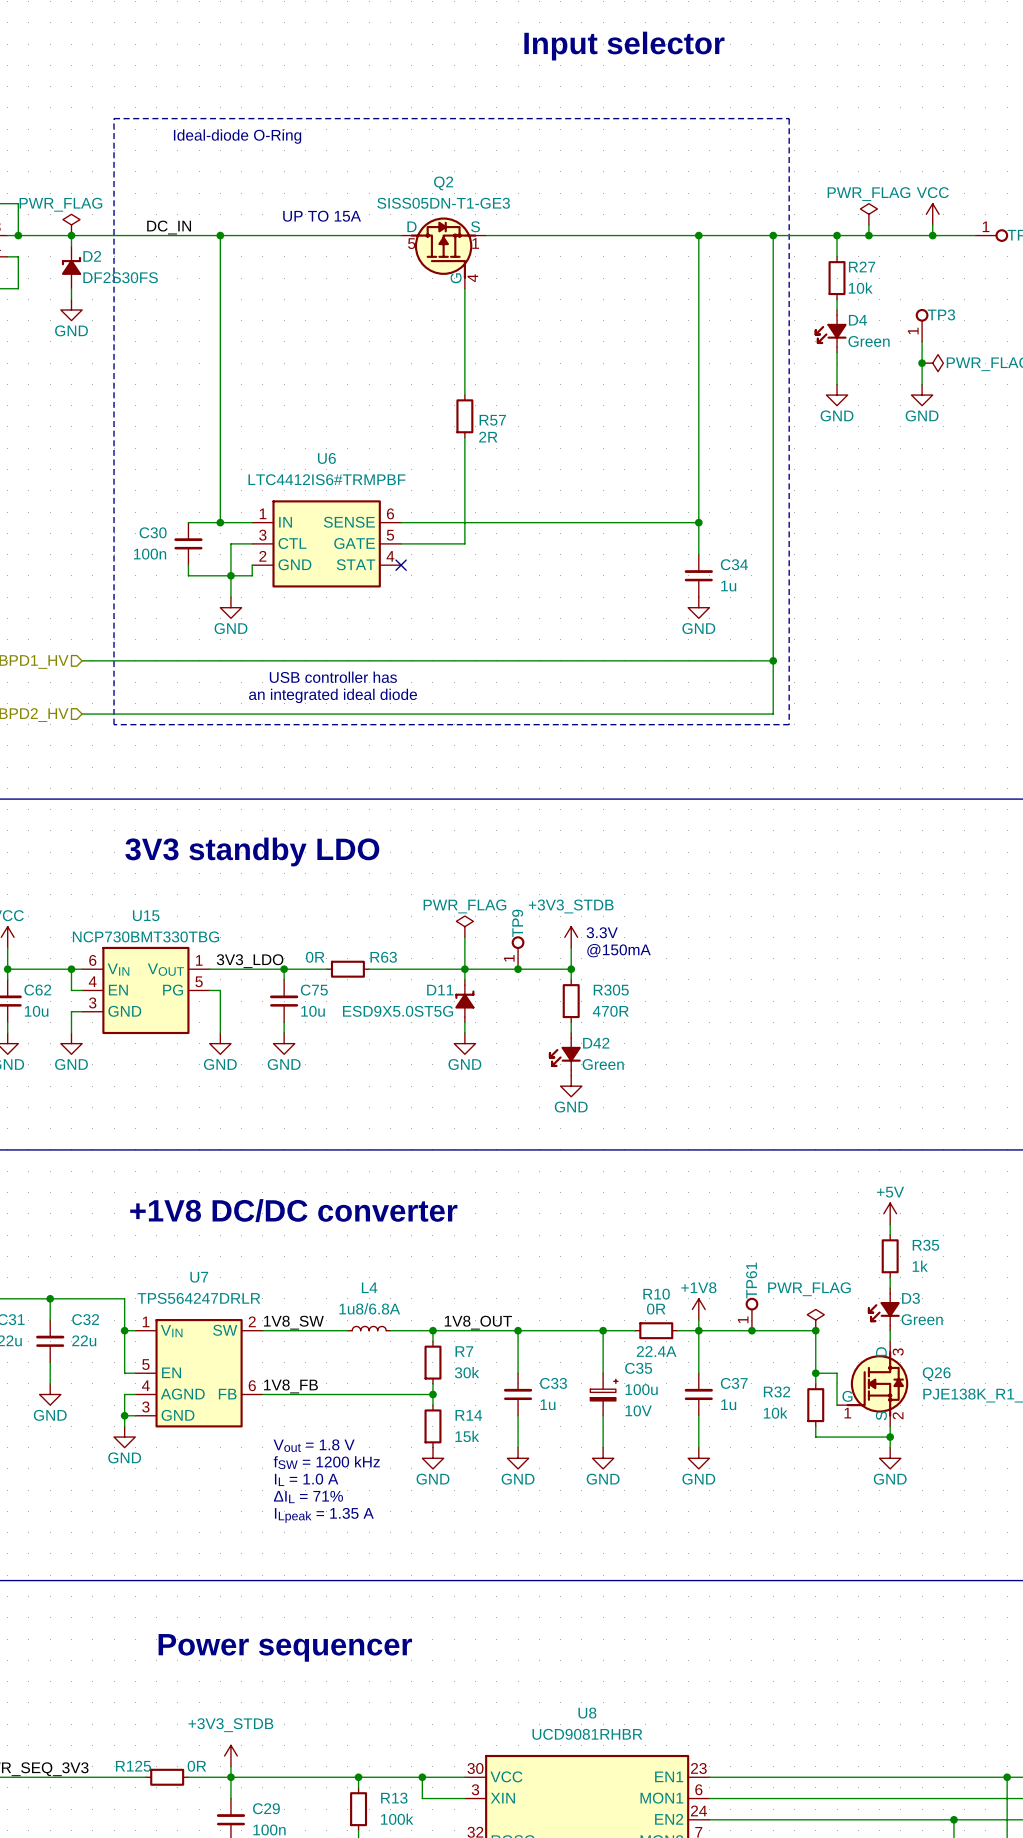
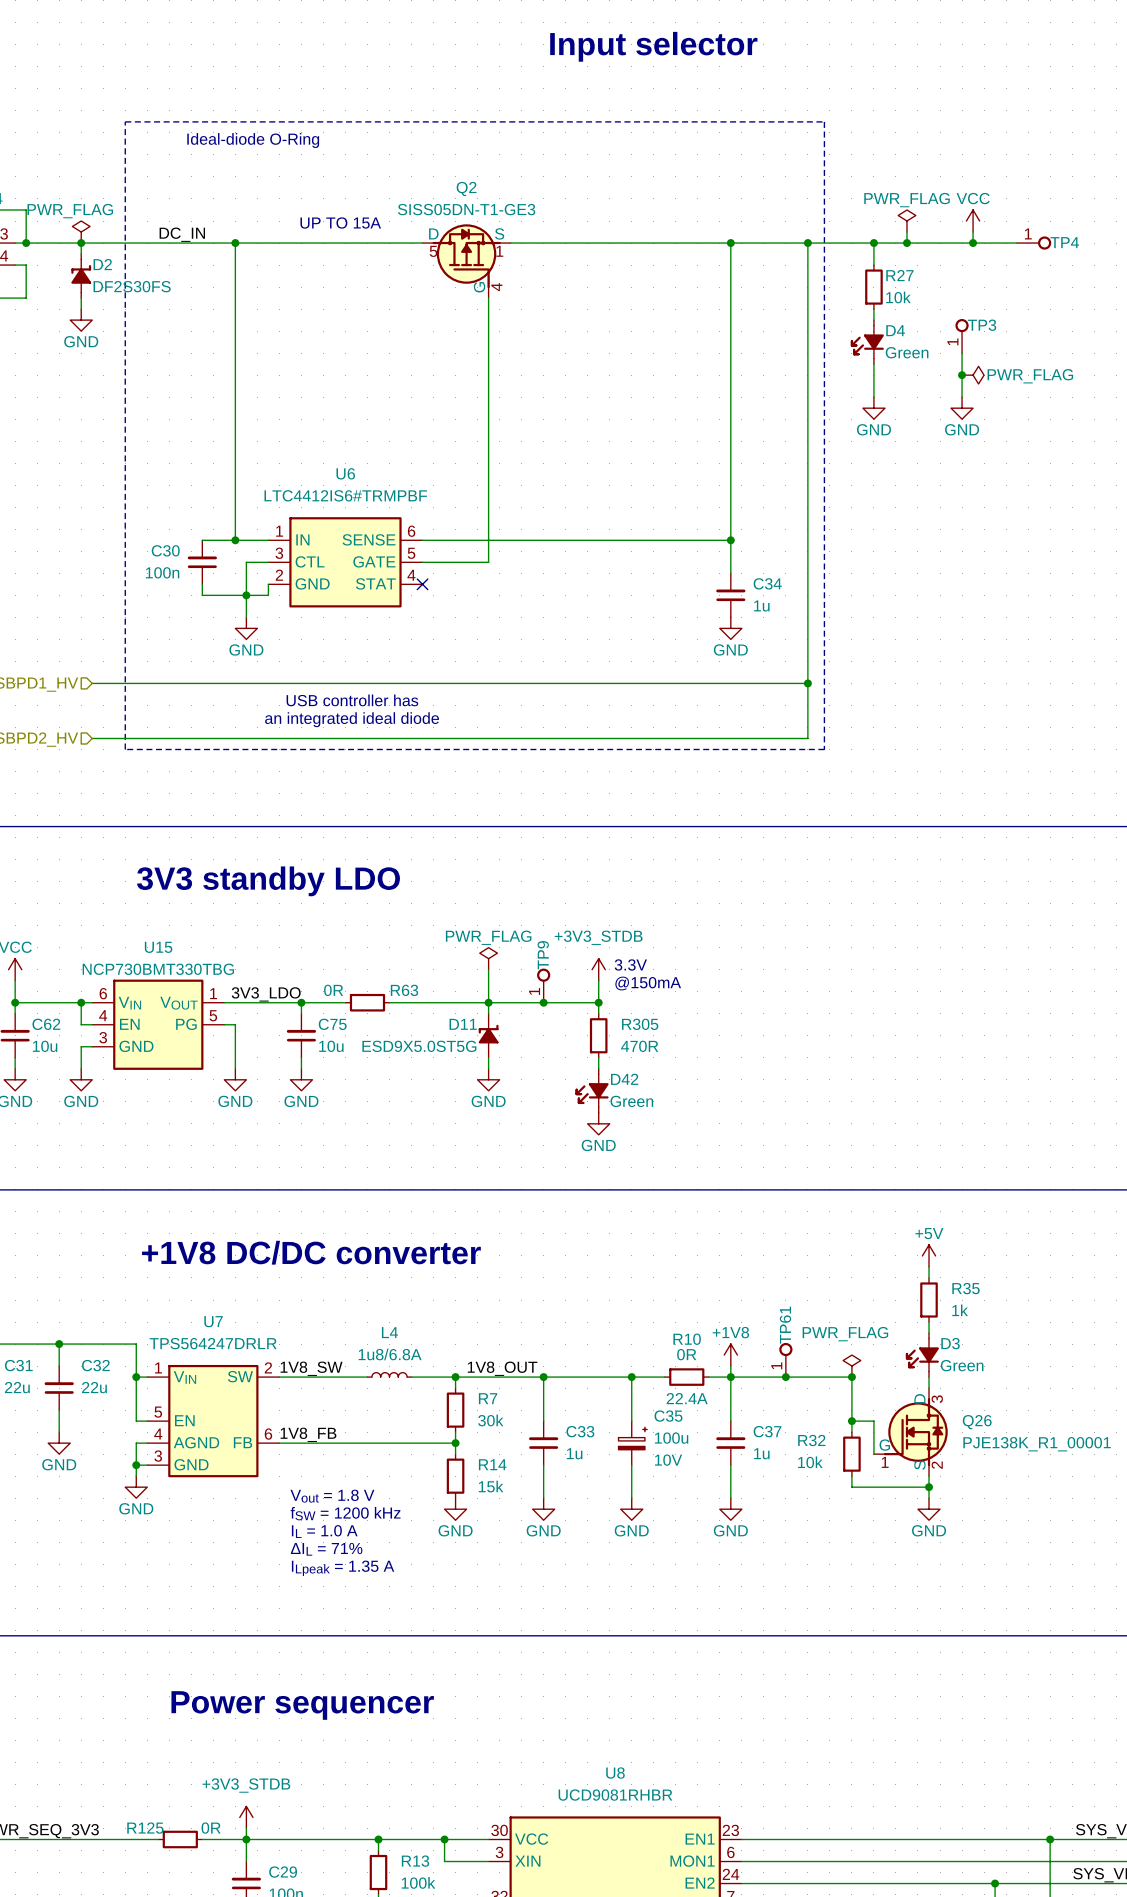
wire: none -> (488, 408) (488, 452)
R57: (464, 416) -> none

